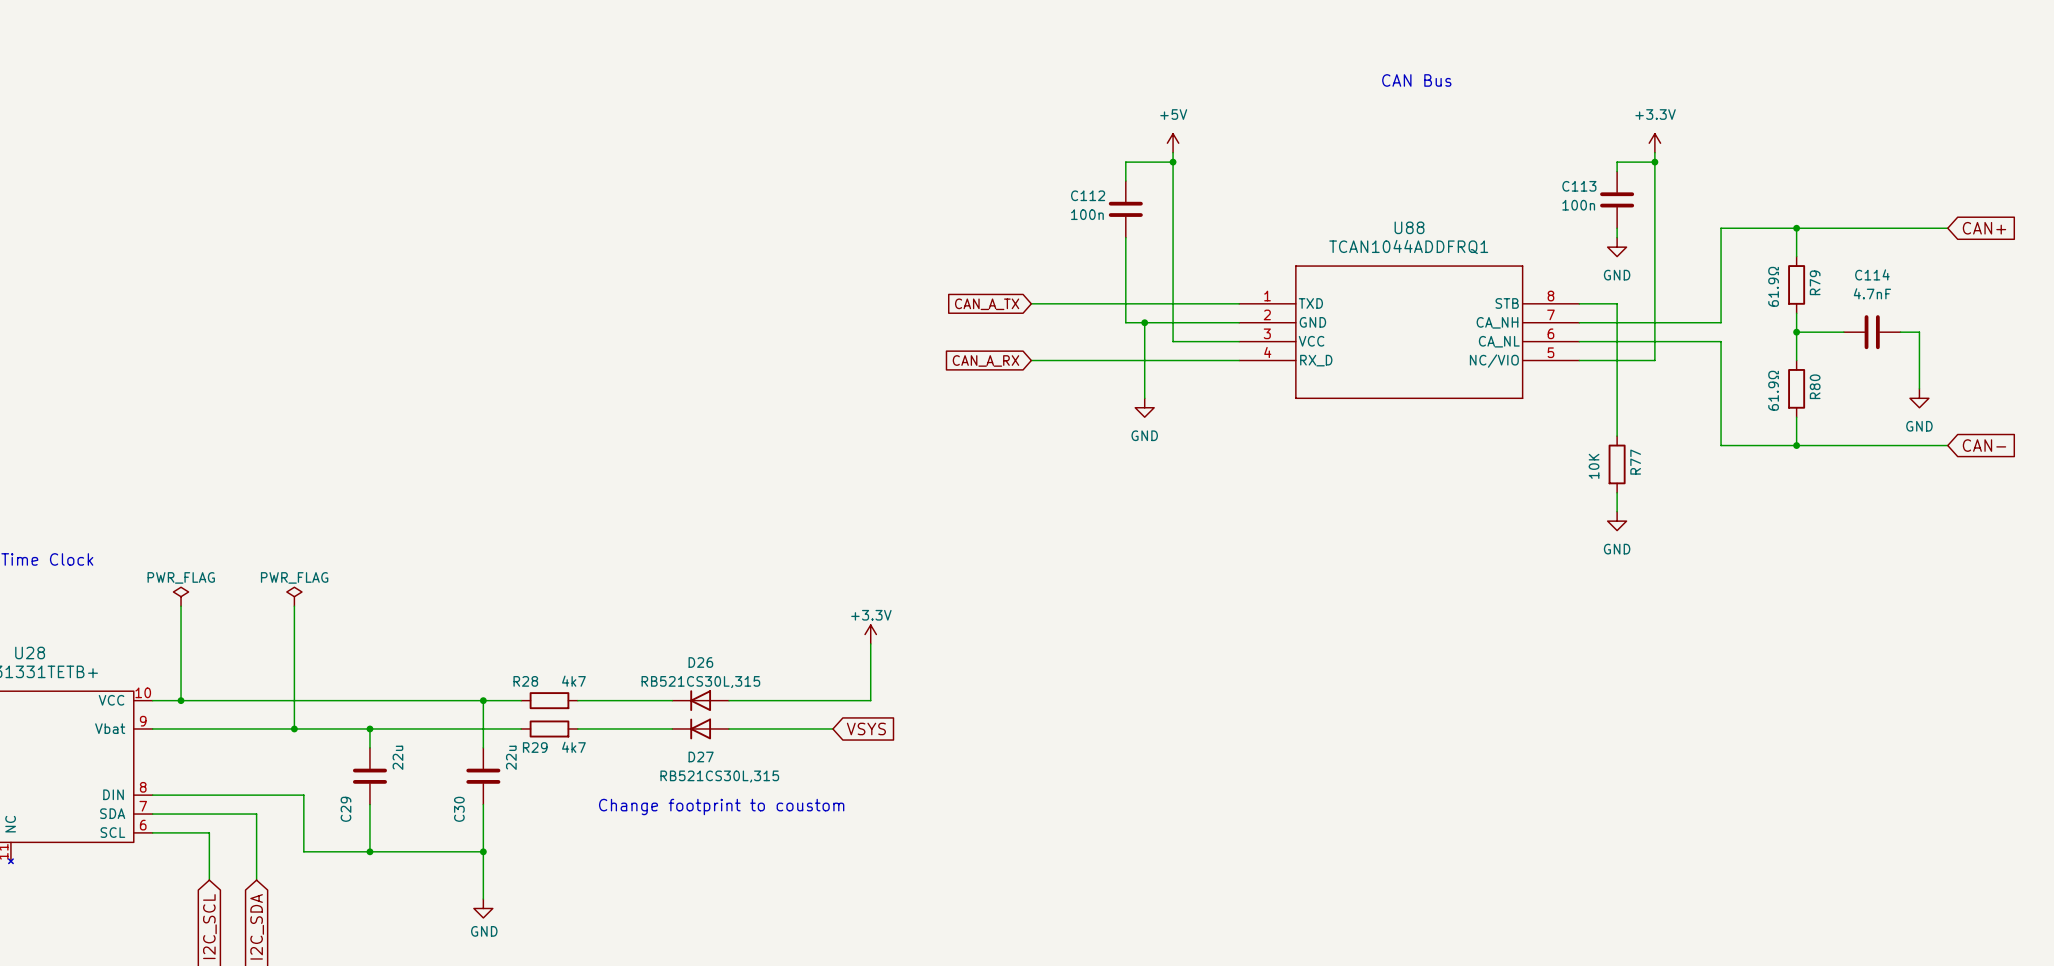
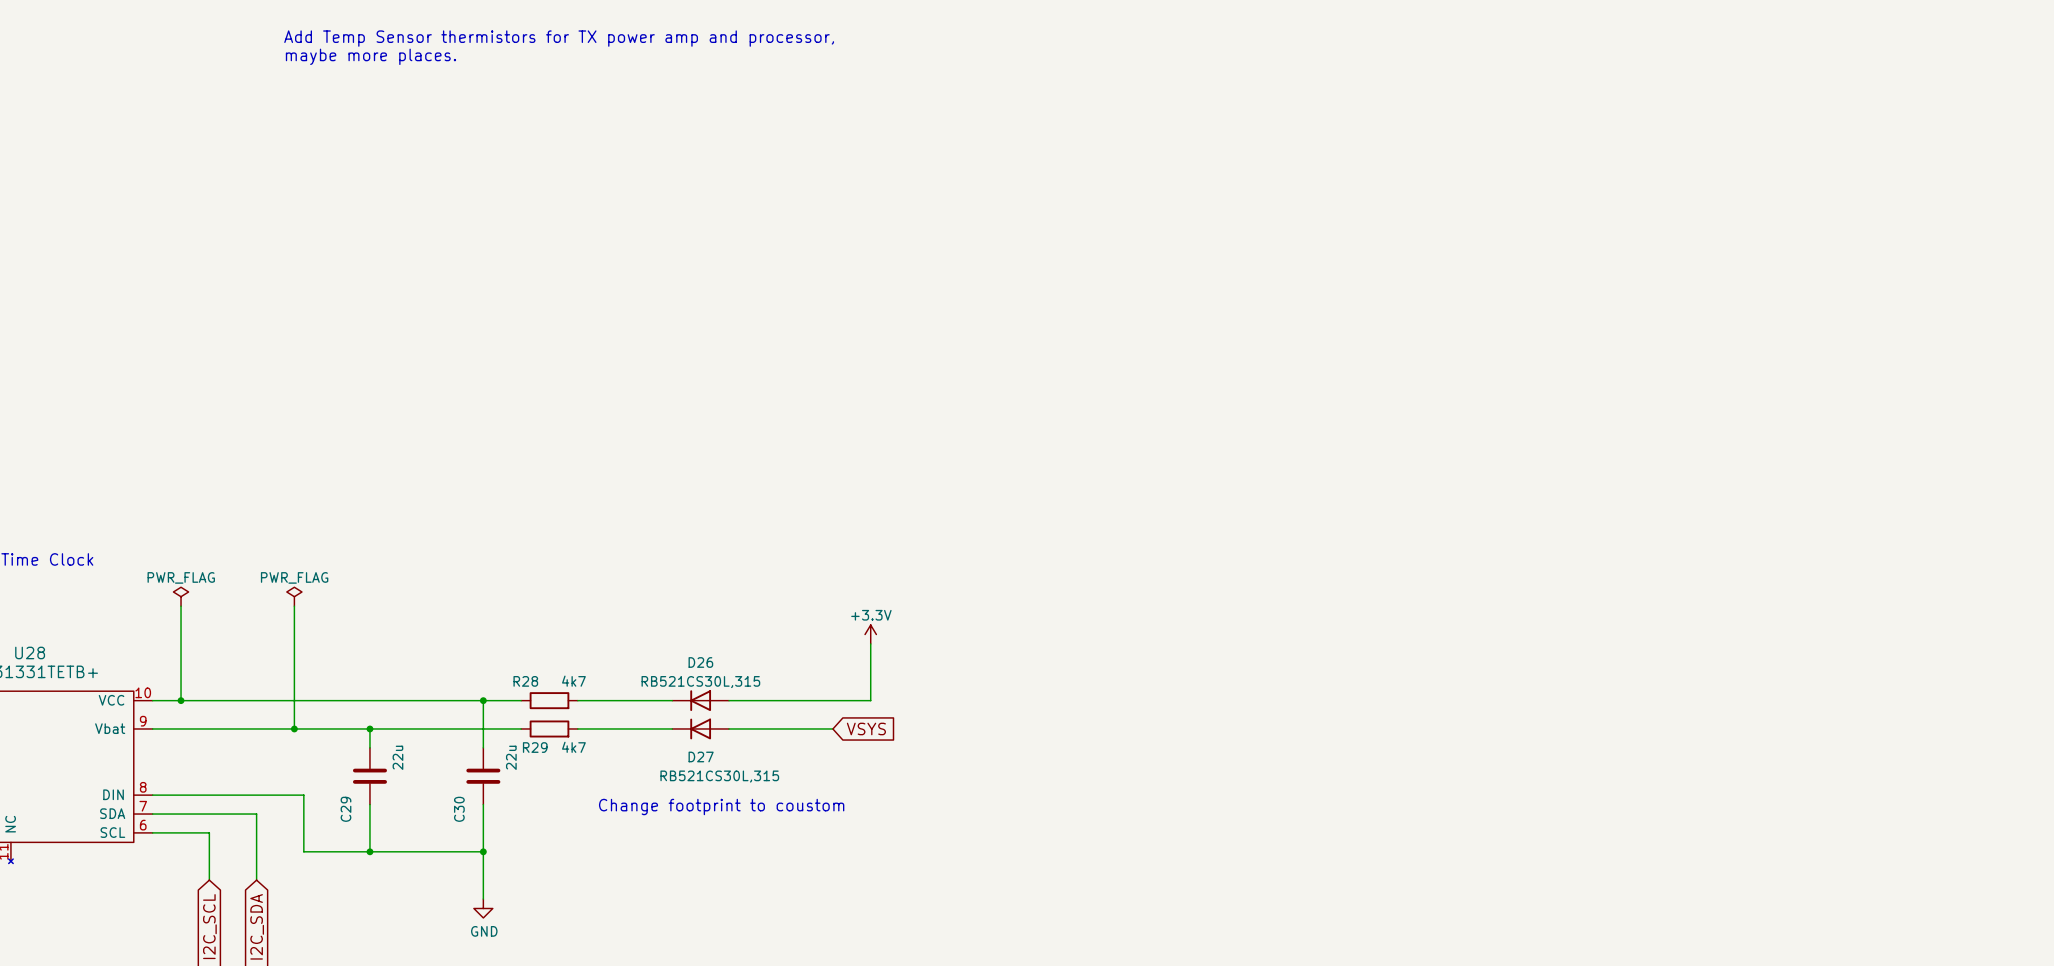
text: none -> Add Temp Sensor thermistors for TX power amp and processor, (559, 38)
text: none -> maybe more places. (370, 56)
text: CAN Bus (1416, 80) -> none
power symbol: +5V (1173, 143) -> none
power symbol: +3.3V (1654, 143) -> none
wire: (1173, 152) (1173, 341) (1239, 341) -> none
wire: (1654, 152) (1654, 360) (1579, 360) -> none
wire: (1173, 162) (1125, 162) (1125, 181) -> none
junction: (1173, 162) -> none
wire: (1654, 162) (1617, 162) (1617, 171) -> none
junction: (1654, 162) -> none
C113: 100n (1617, 199) -> none
C112: 100n (1125, 209) -> none
wire: (1617, 228) (1617, 237) -> none
wire: (1796, 228) (1796, 256) -> none
junction: (1796, 228) -> none
wire: (1947, 228) (1721, 228) (1721, 322) (1579, 322) -> none
global label: CAN+ (1984, 228) -> none
wire: (1125, 237) (1125, 322) (1239, 322) -> none
power symbol: GND (1617, 247) -> none
R79: 61.9Ω (1796, 284) -> none
wire: (1031, 303) (1239, 303) -> none
wire: (1579, 303) (1617, 303) (1617, 436) -> none
global label: CAN_A_TX (987, 304) -> none
wire: (1796, 313) (1796, 360) -> none
wire: (1144, 322) (1144, 398) -> none
junction: (1144, 322) -> none
U88: TCAN1044ADDFRQ1 (1409, 332) -> none
wire: (1796, 332) (1843, 332) -> none
junction: (1796, 332) -> none
C114: 4.7nF (1872, 332) -> none
wire: (1900, 332) (1919, 332) (1919, 388) -> none
wire: (1579, 341) (1721, 341) (1721, 445) (1947, 445) -> none
global label: CAN_A_RX (985, 360) -> none
wire: (1031, 360) (1239, 360) -> none
R80: 61.9Ω (1796, 388) -> none
power symbol: GND (1919, 398) -> none
power symbol: GND (1144, 407) -> none
wire: (1796, 417) (1796, 445) -> none
junction: (1796, 445) -> none
global label: CAN- (1984, 445) -> none
R77: 10K (1617, 464) -> none
wire: (1617, 492) (1617, 511) -> none
power symbol: GND (1617, 521) -> none

